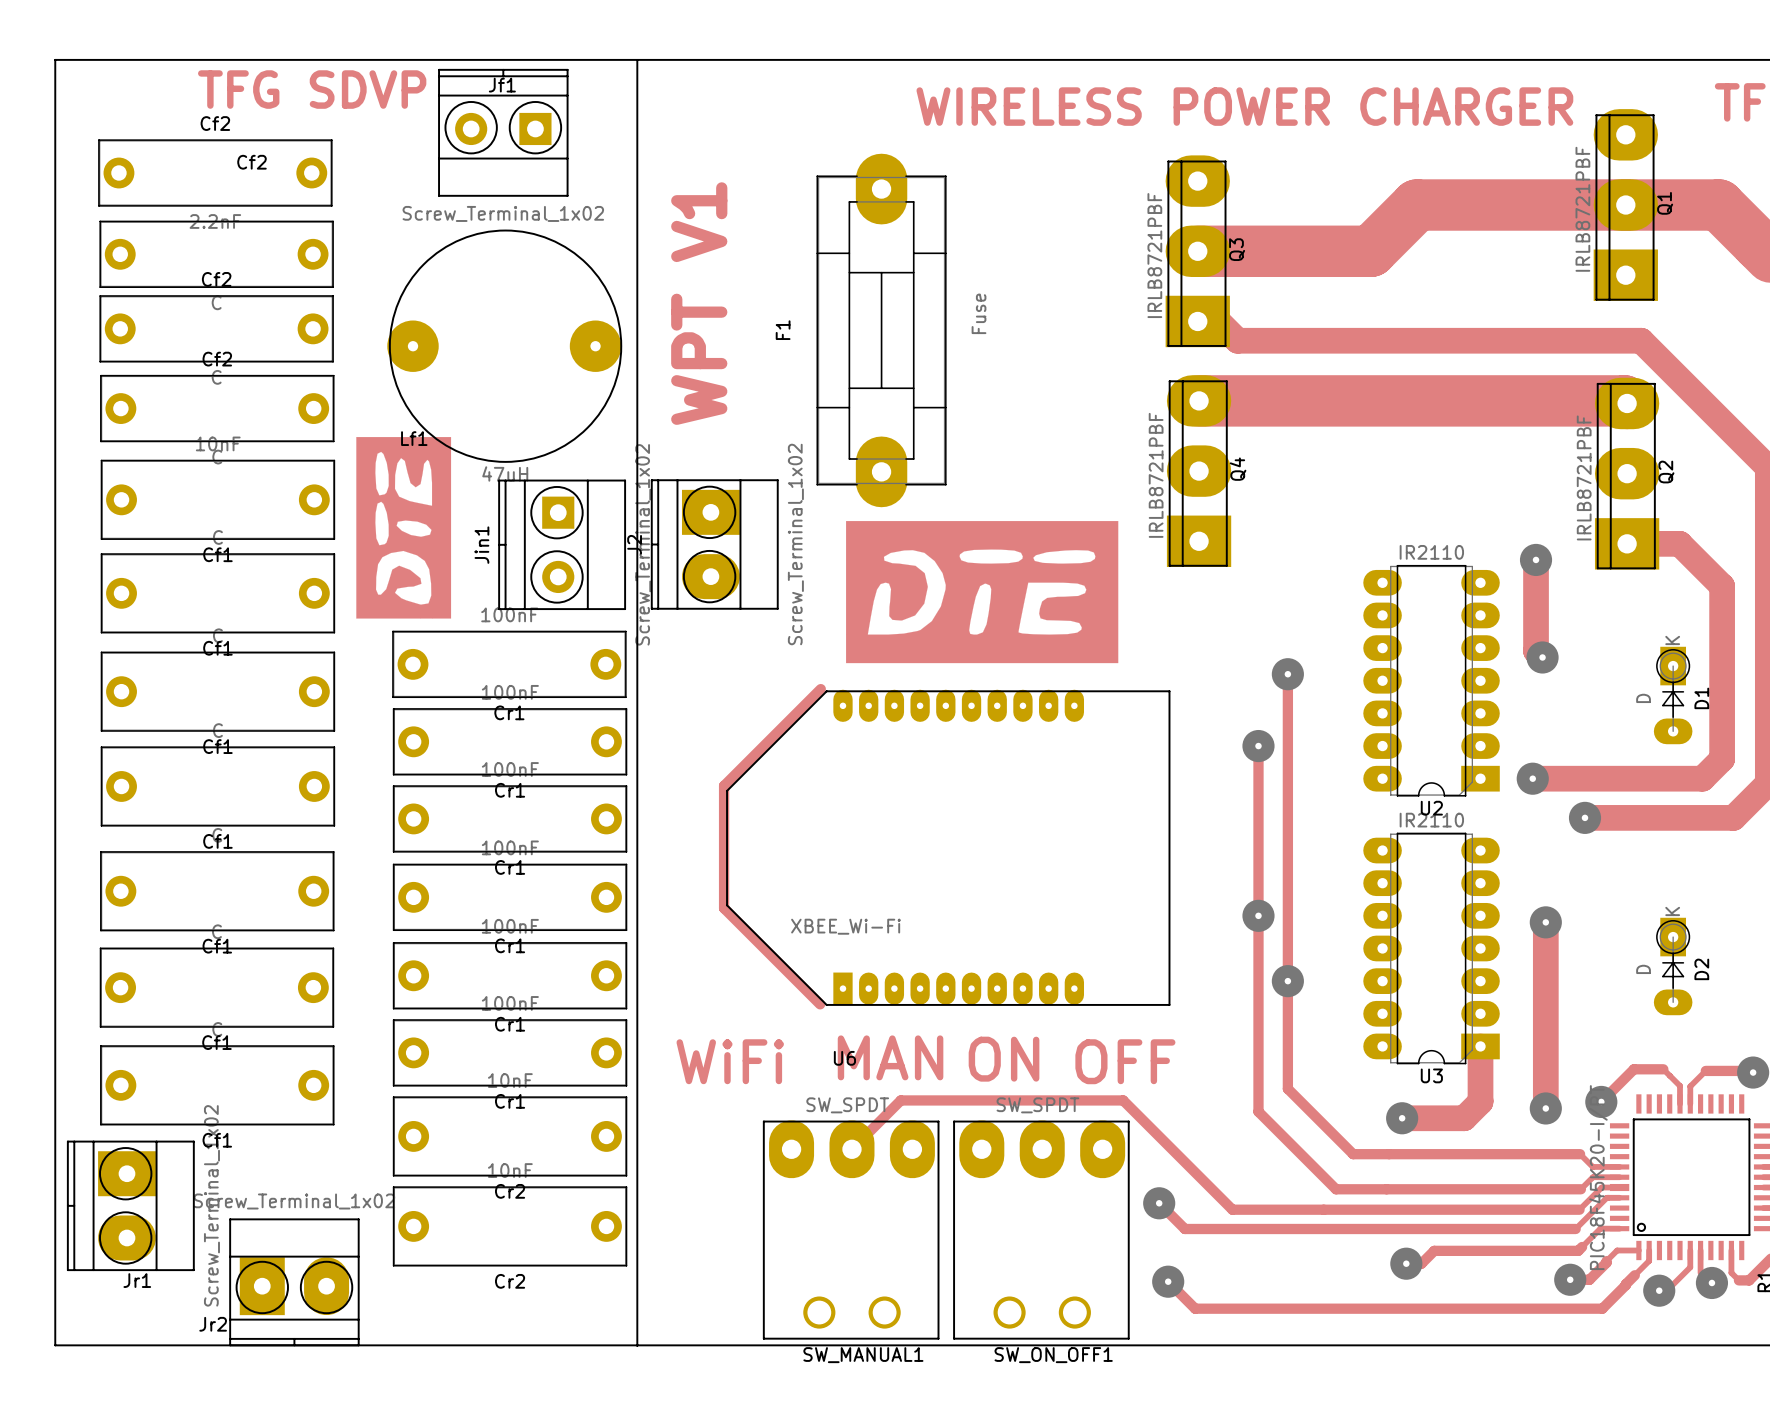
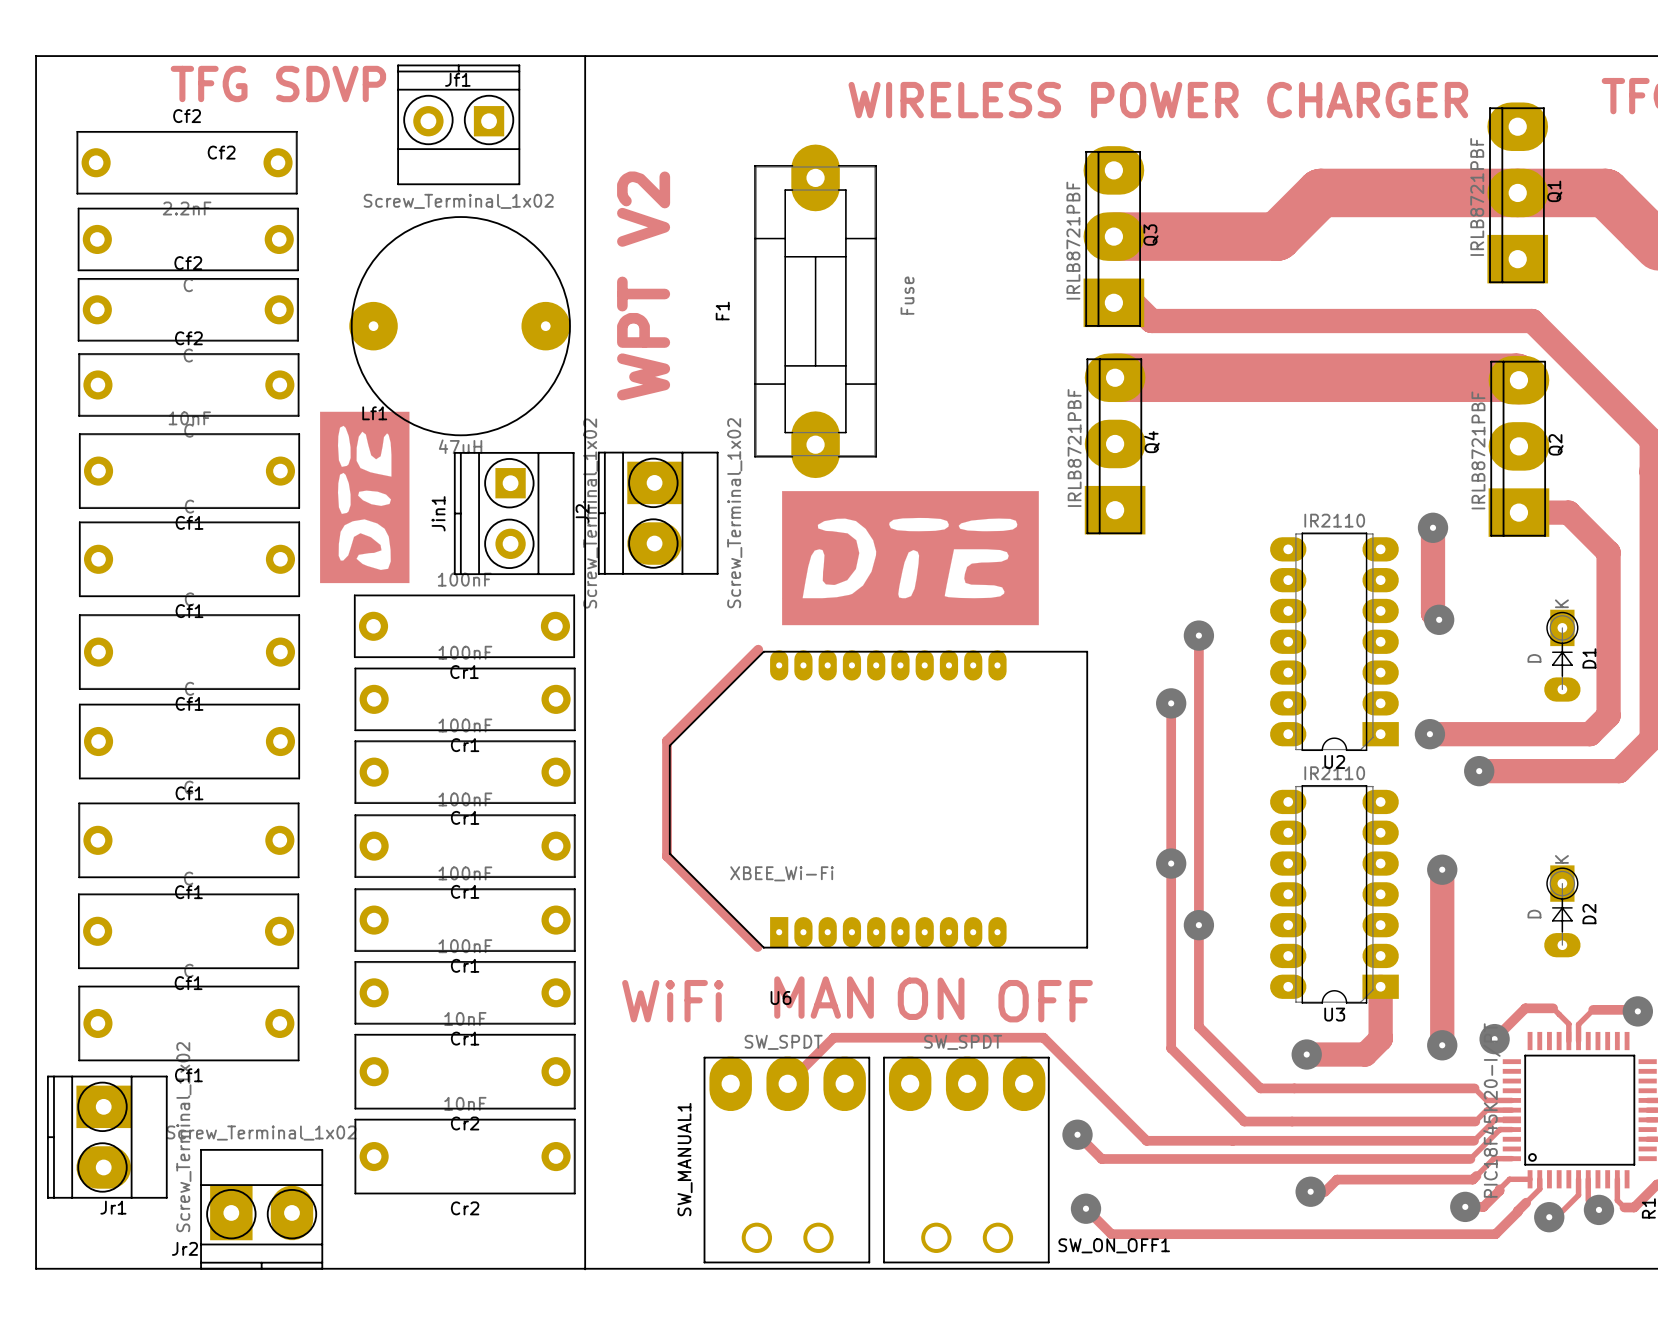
text: WPT V1 (699, 303) -> WPT V2 (643, 285)
SW_MANUAL1 name rotation: 0° (863, 1355) -> 90° counterclockwise (685, 1159)
SW_MANUAL1 name position: SW_MANUAL1 (863, 1355) -> SW_MANUAL1 (685, 1159)
SW_ON_OFF1 name position: SW_ON_OFF1 (1053, 1355) -> SW_ON_OFF1 (1114, 1245)

